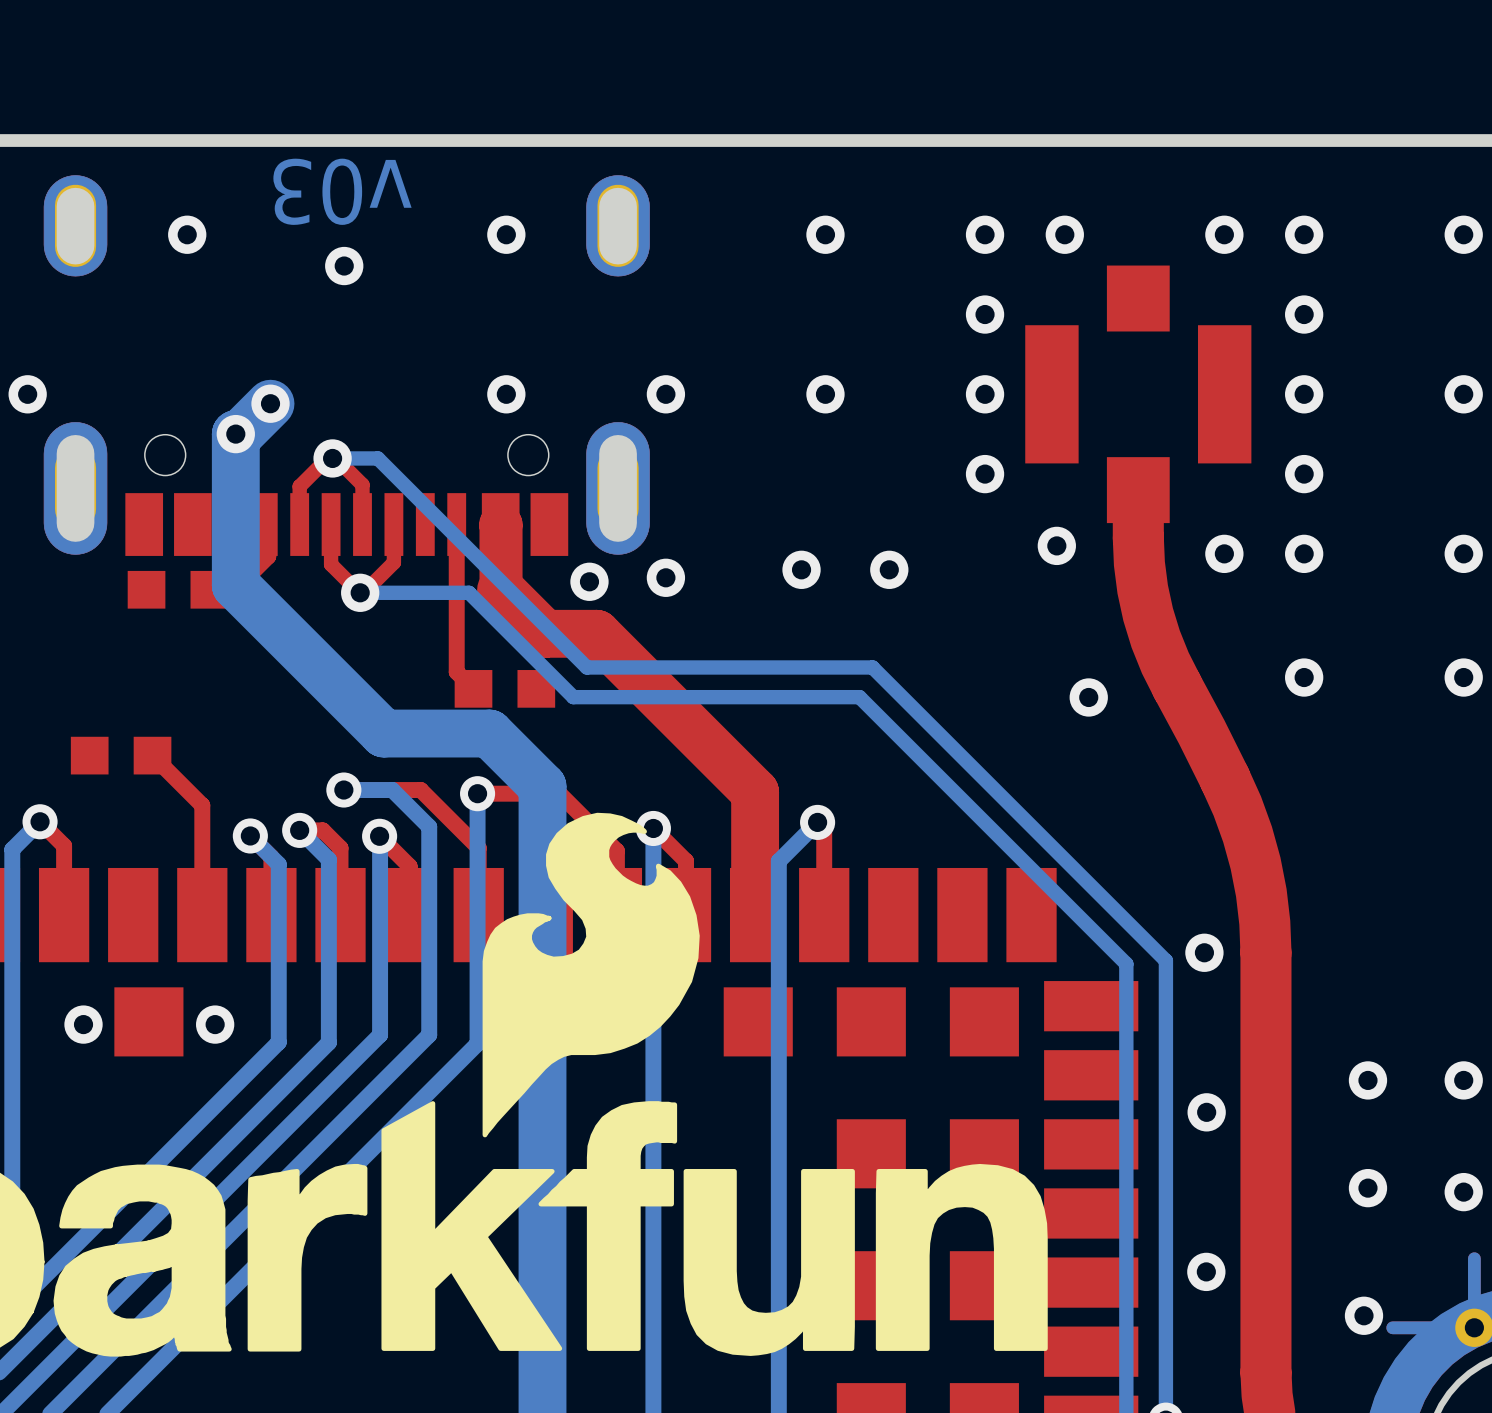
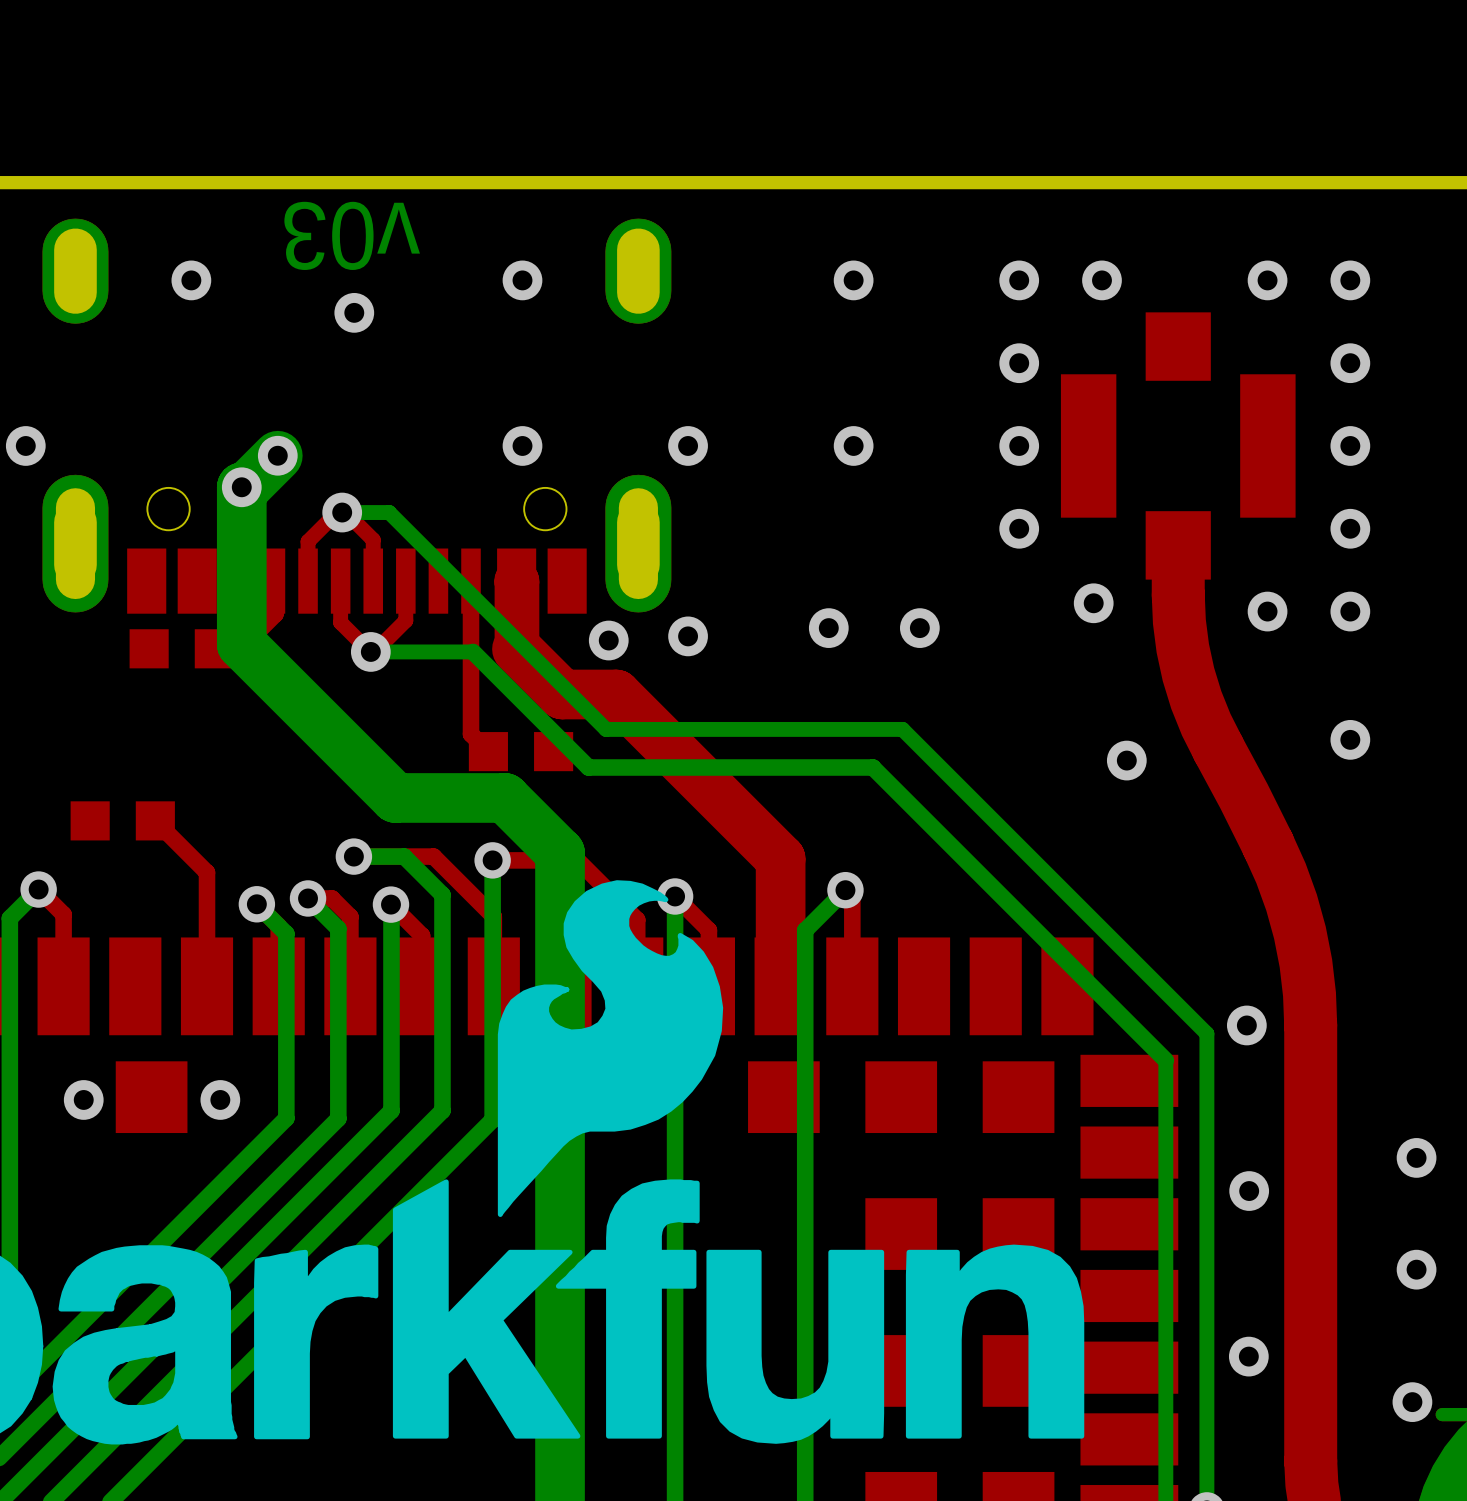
bottom track: (458, 592) (469, 592) (573, 697) (859, 697) (1126, 963) (1126, 986) -> (472, 651) (588, 767) (872, 767) (1165, 1060)

